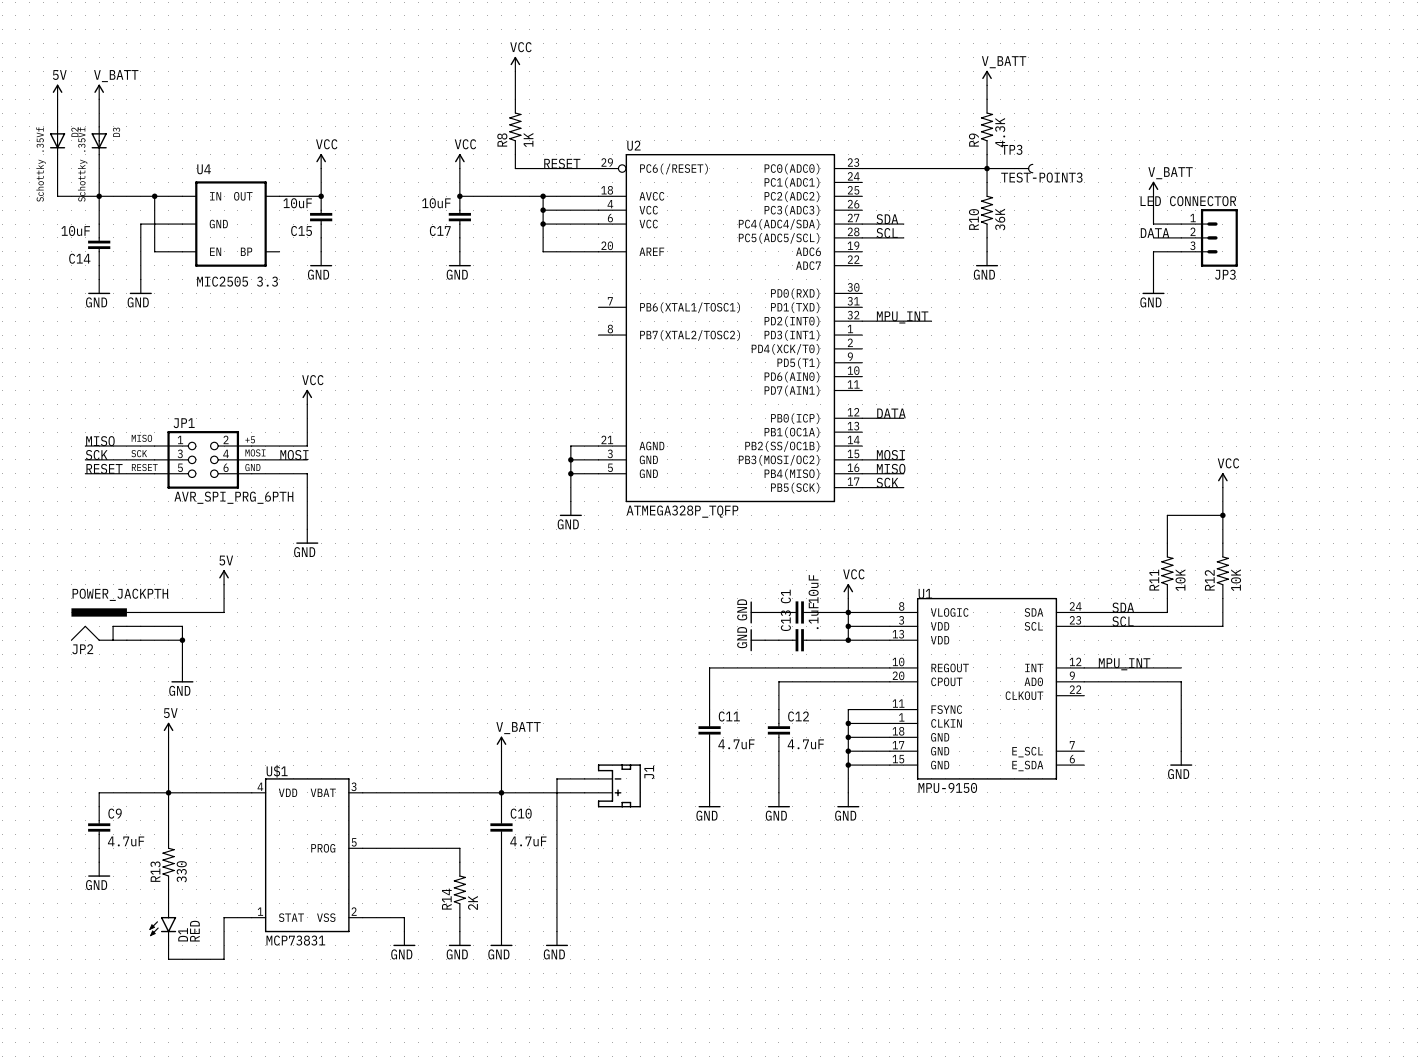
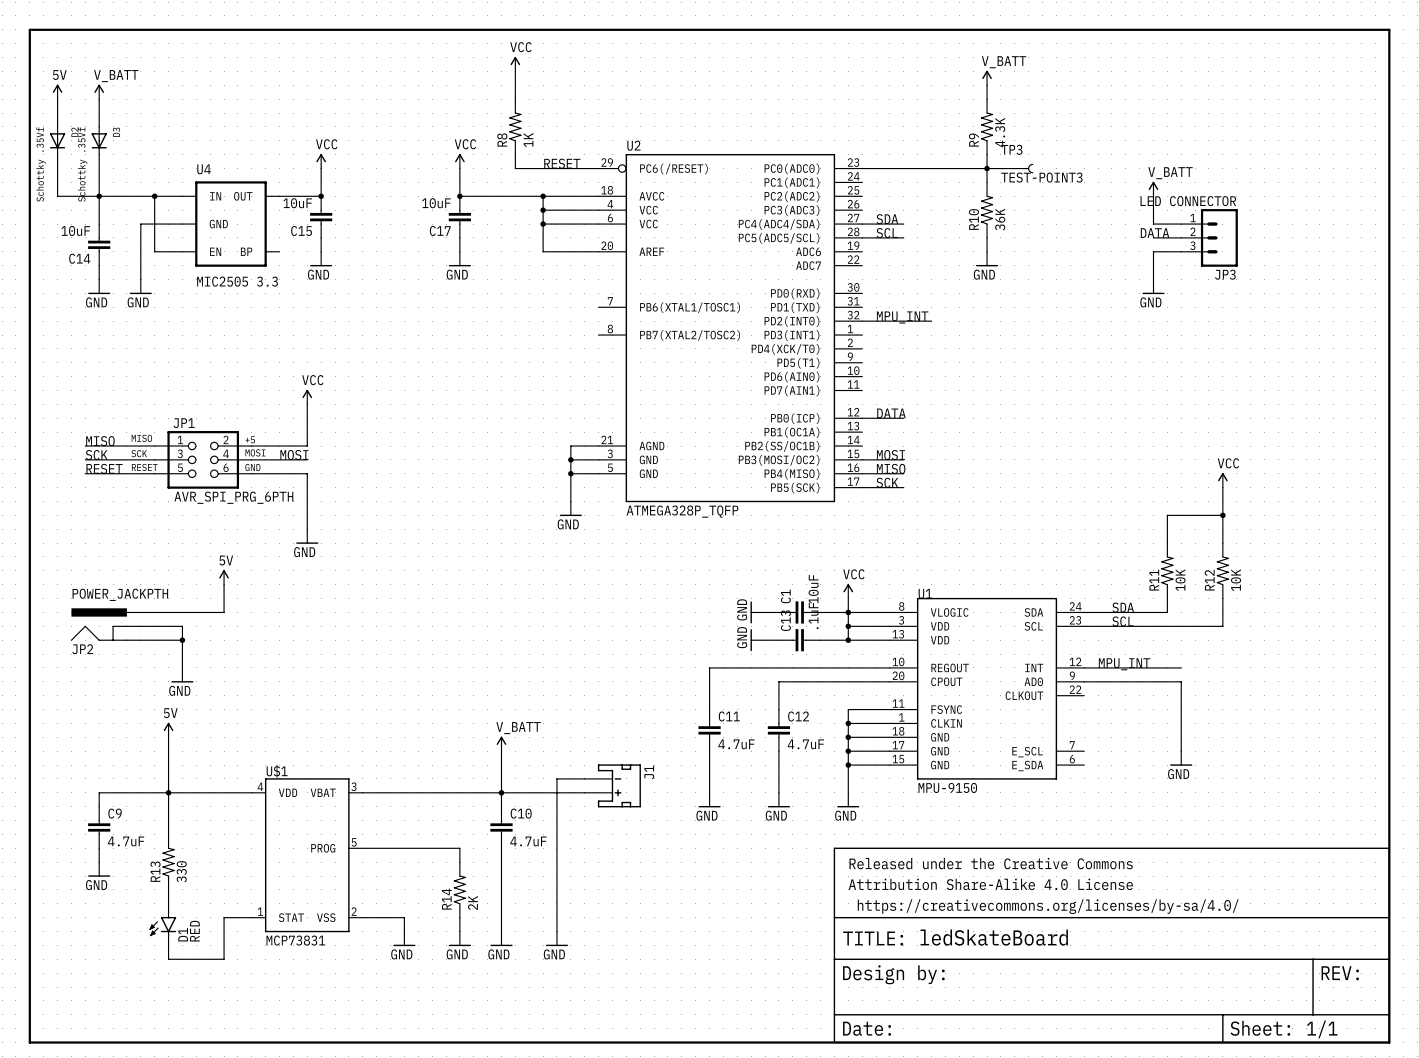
part: none -> (709, 536)
part: none -> (1111, 945)

